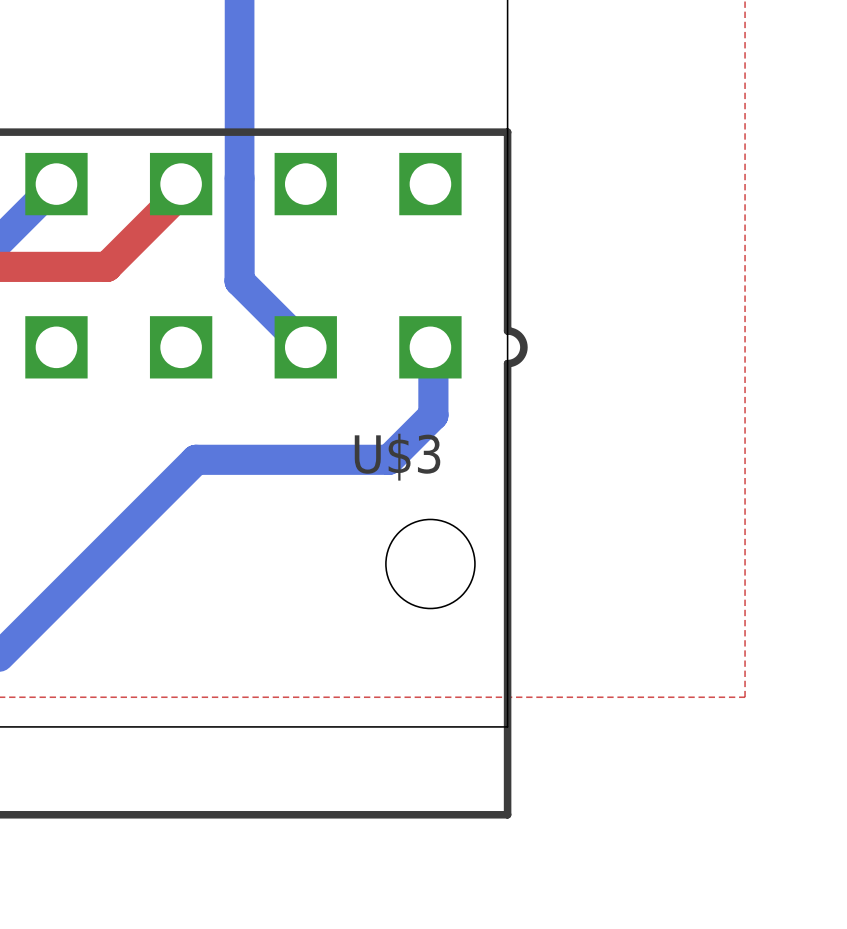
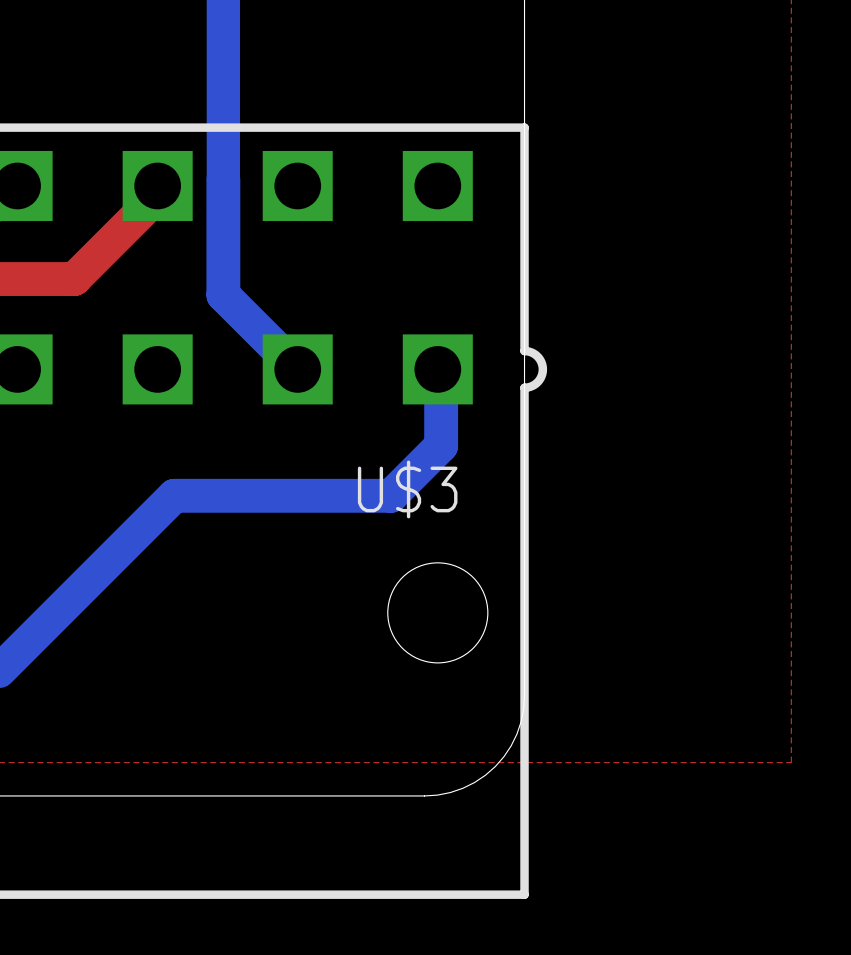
board edge: (507, 637) (507, 726) (418, 726) -> (524, 695) (521, 721) (516, 734) (503, 756) (495, 766) (485, 775) (462, 788) (450, 792) (424, 795)

